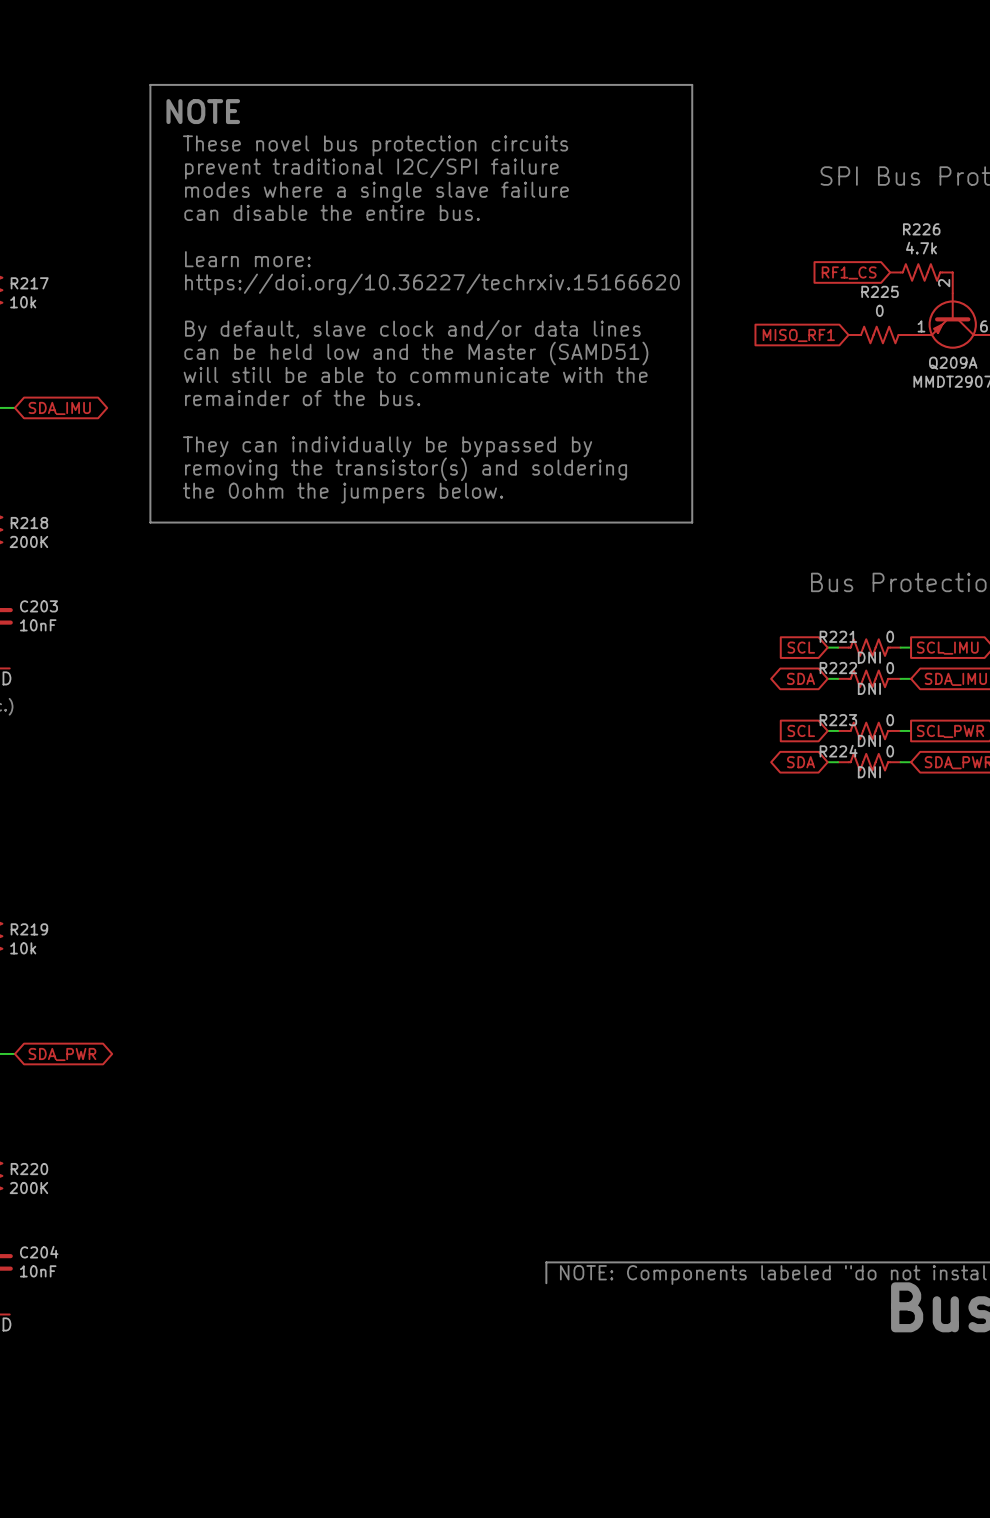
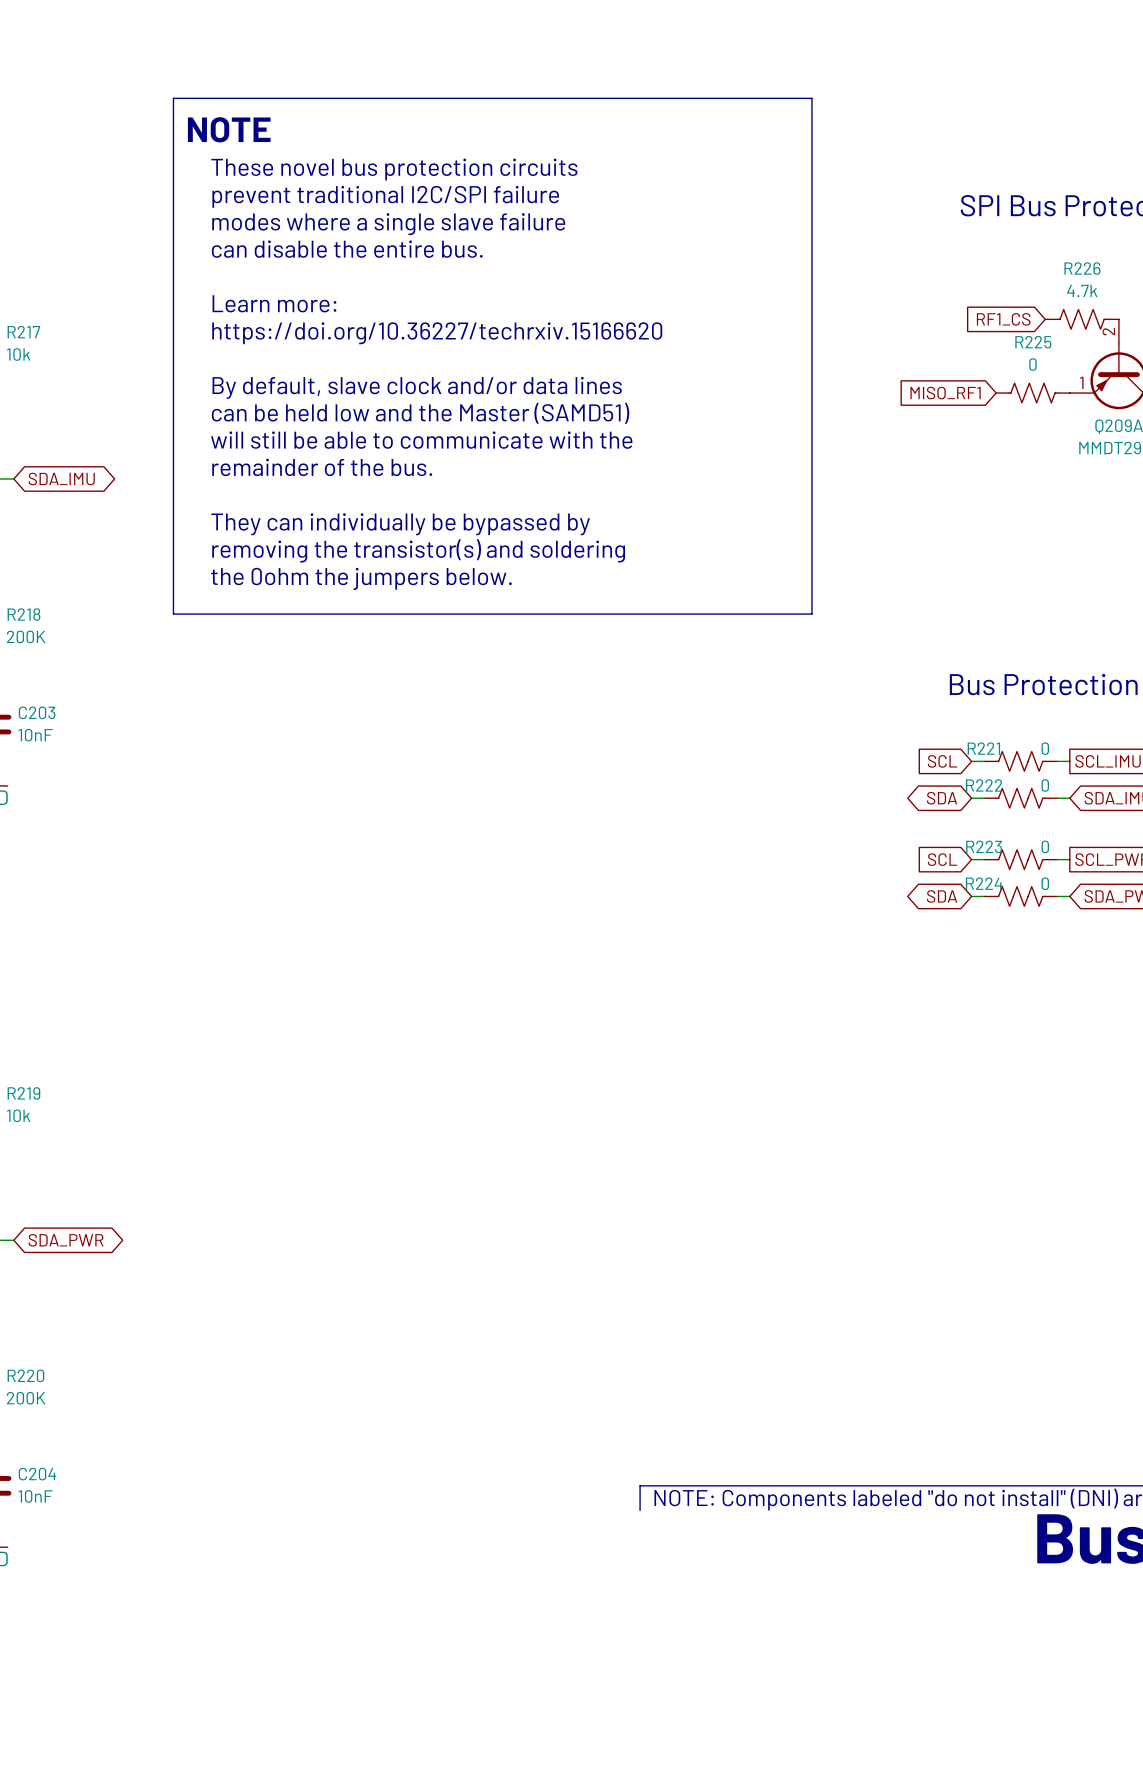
R221 text: DNI (869, 657) -> none
R222 text: DNI (869, 688) -> none
R223 text: DNI (869, 740) -> none
R224 text: DNI (869, 772) -> none

